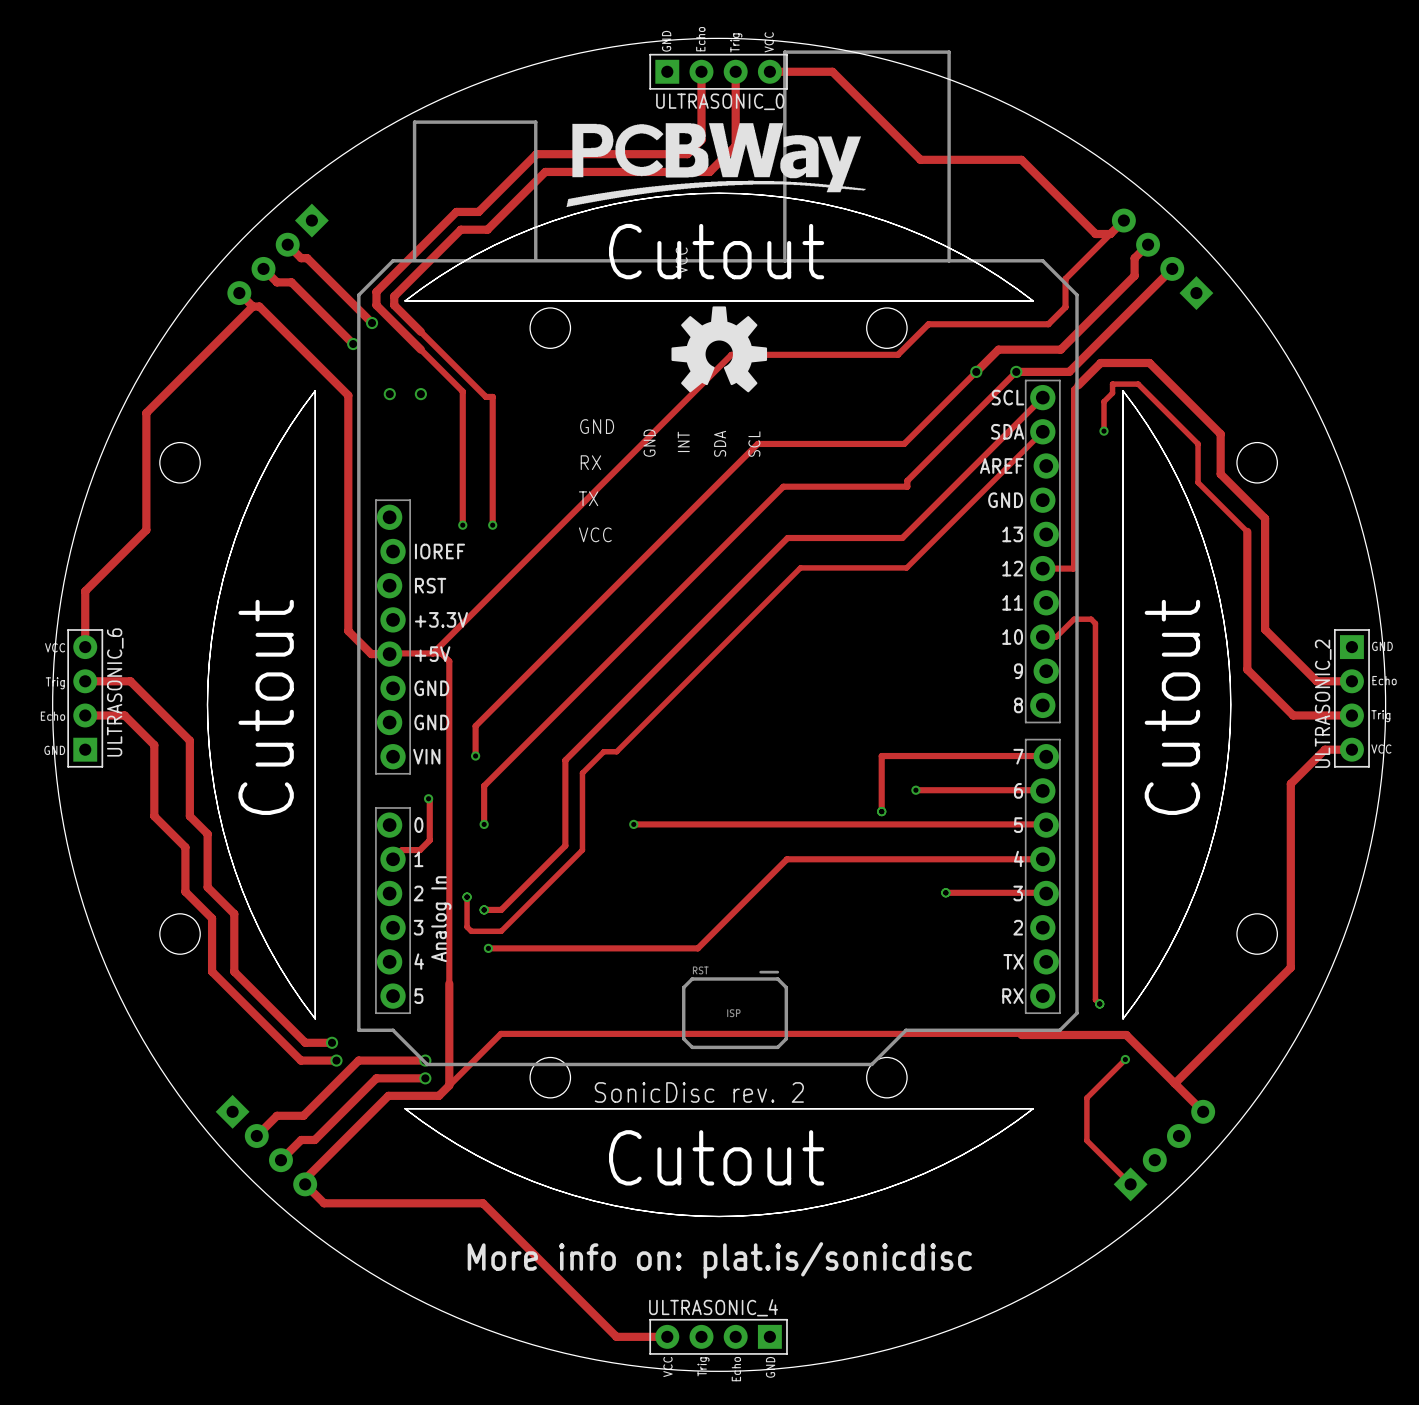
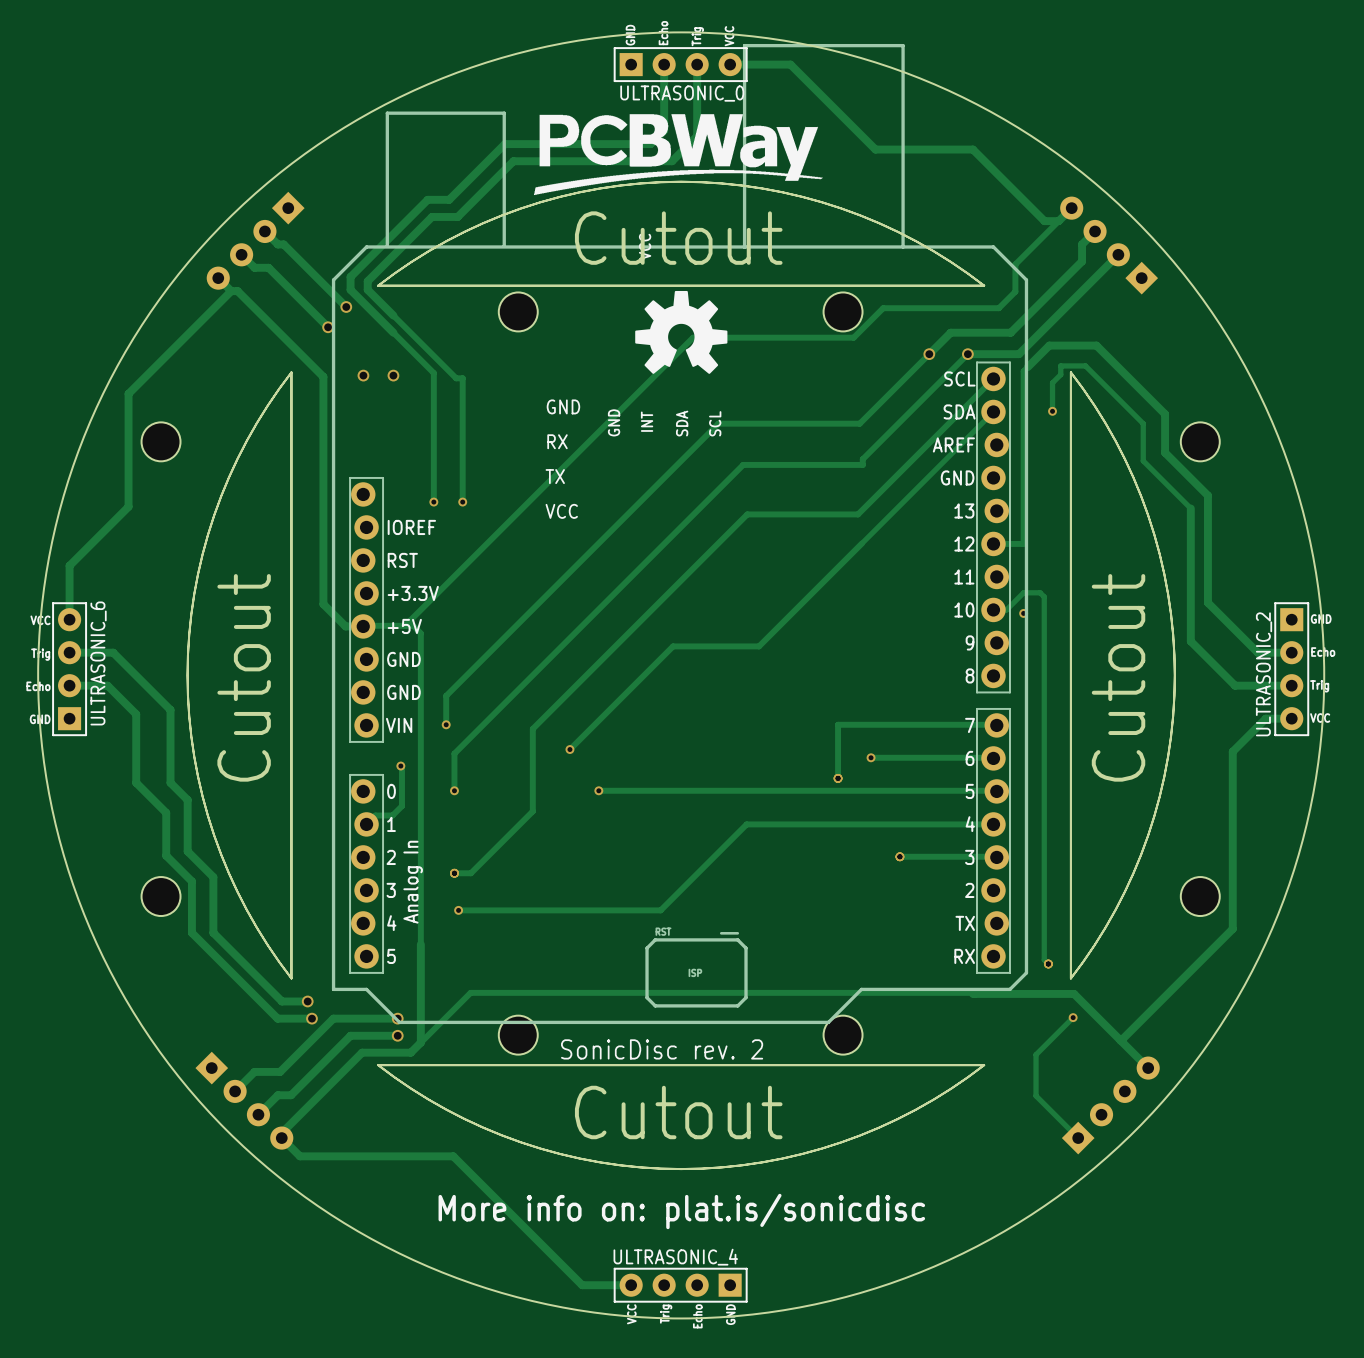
track: (906, 567) (800, 567) (616, 751) (603, 751) (582, 773) (582, 850) (501, 931) (471, 931) (467, 927) (467, 897) -> (862, 543) (759, 646) (673, 646) (569, 749)
via: none -> (1023, 613)
via: none -> (569, 749)
via: (467, 897) -> none

